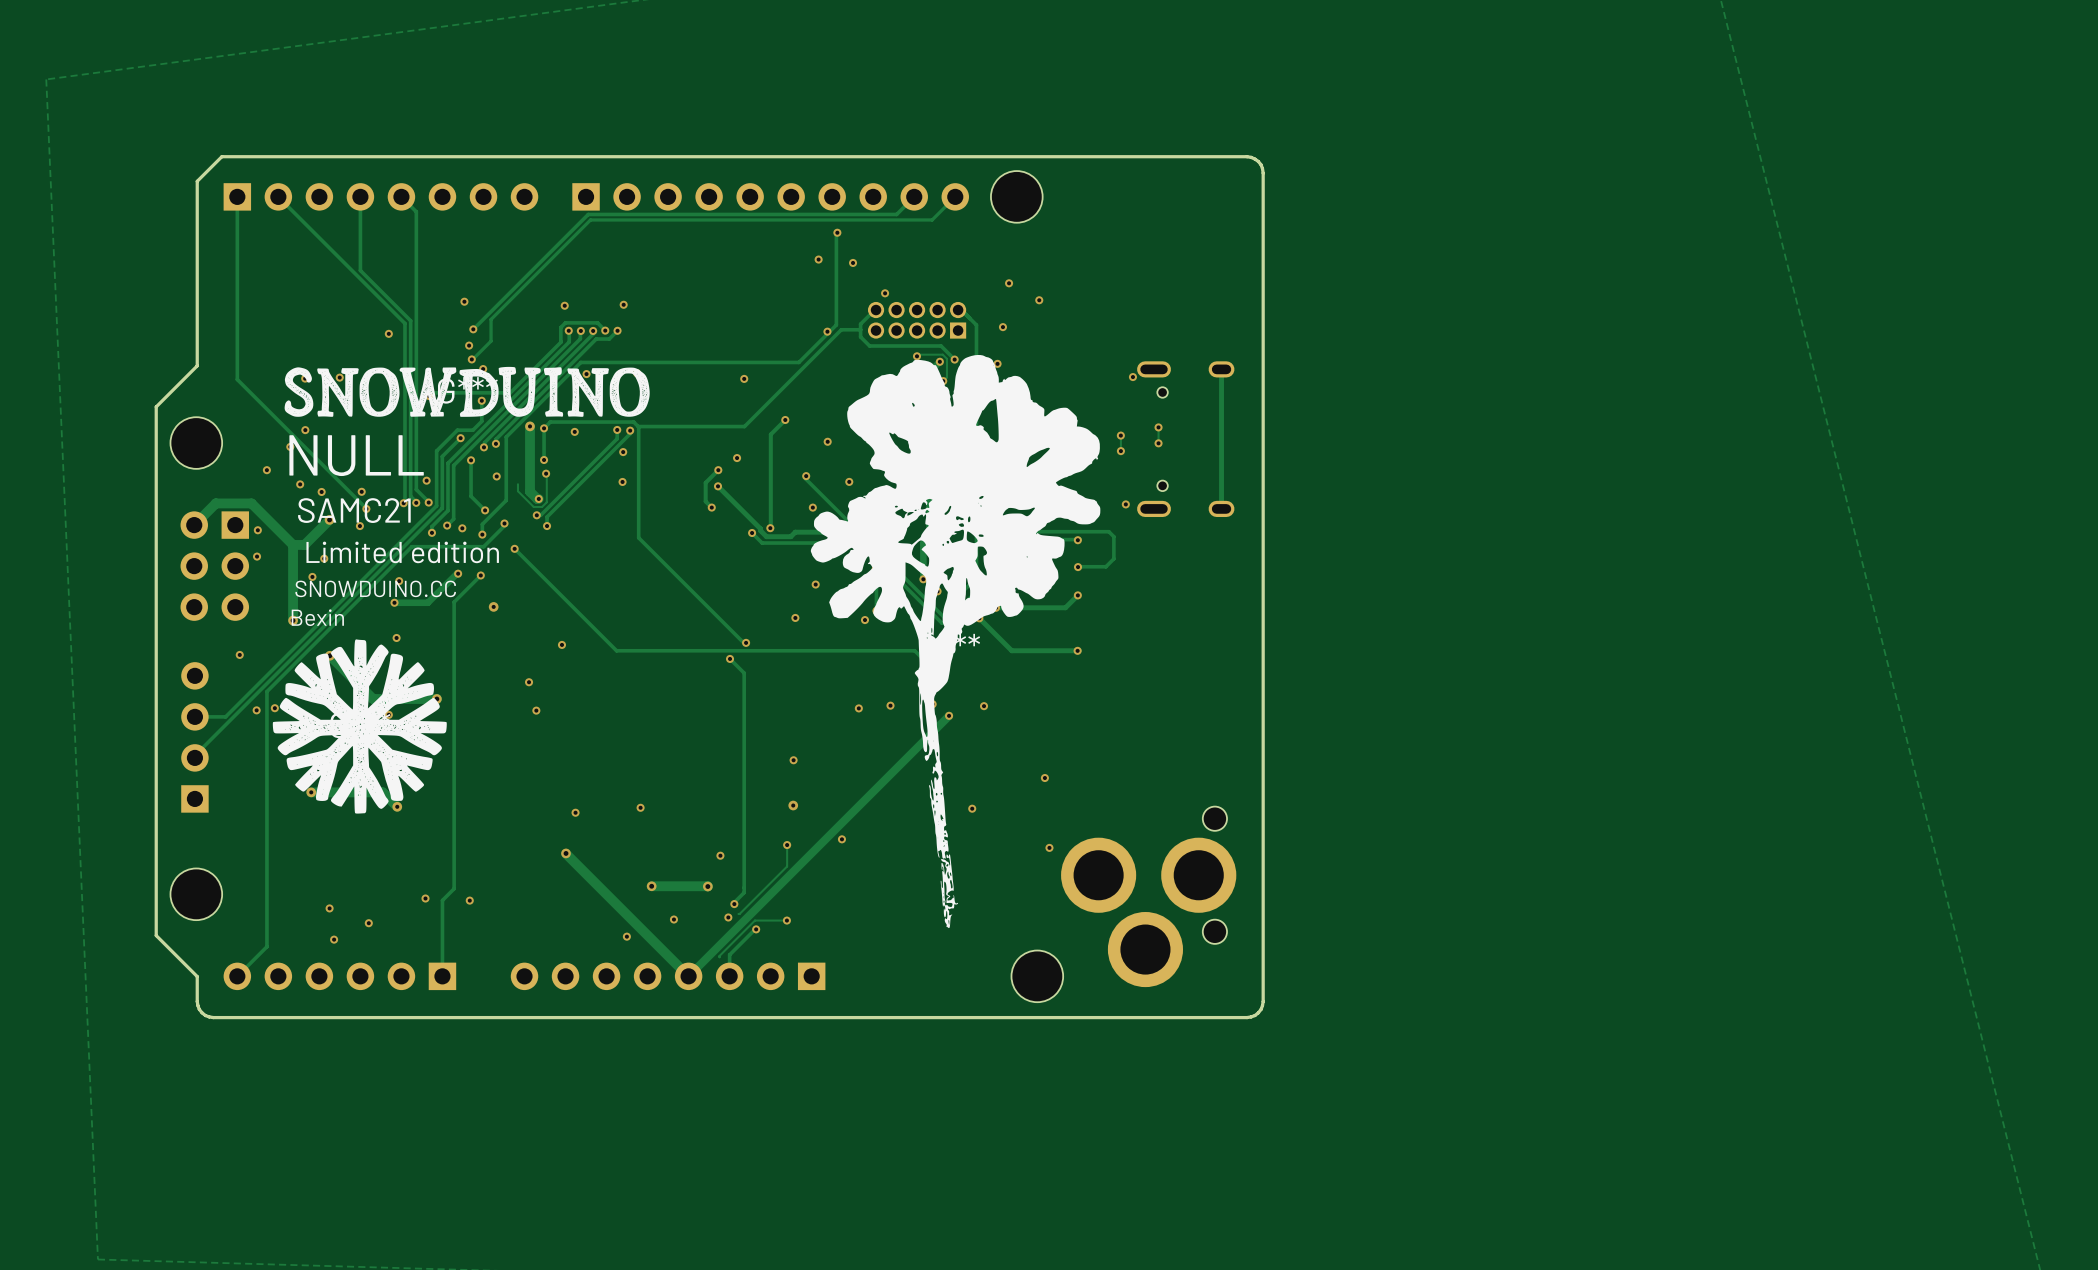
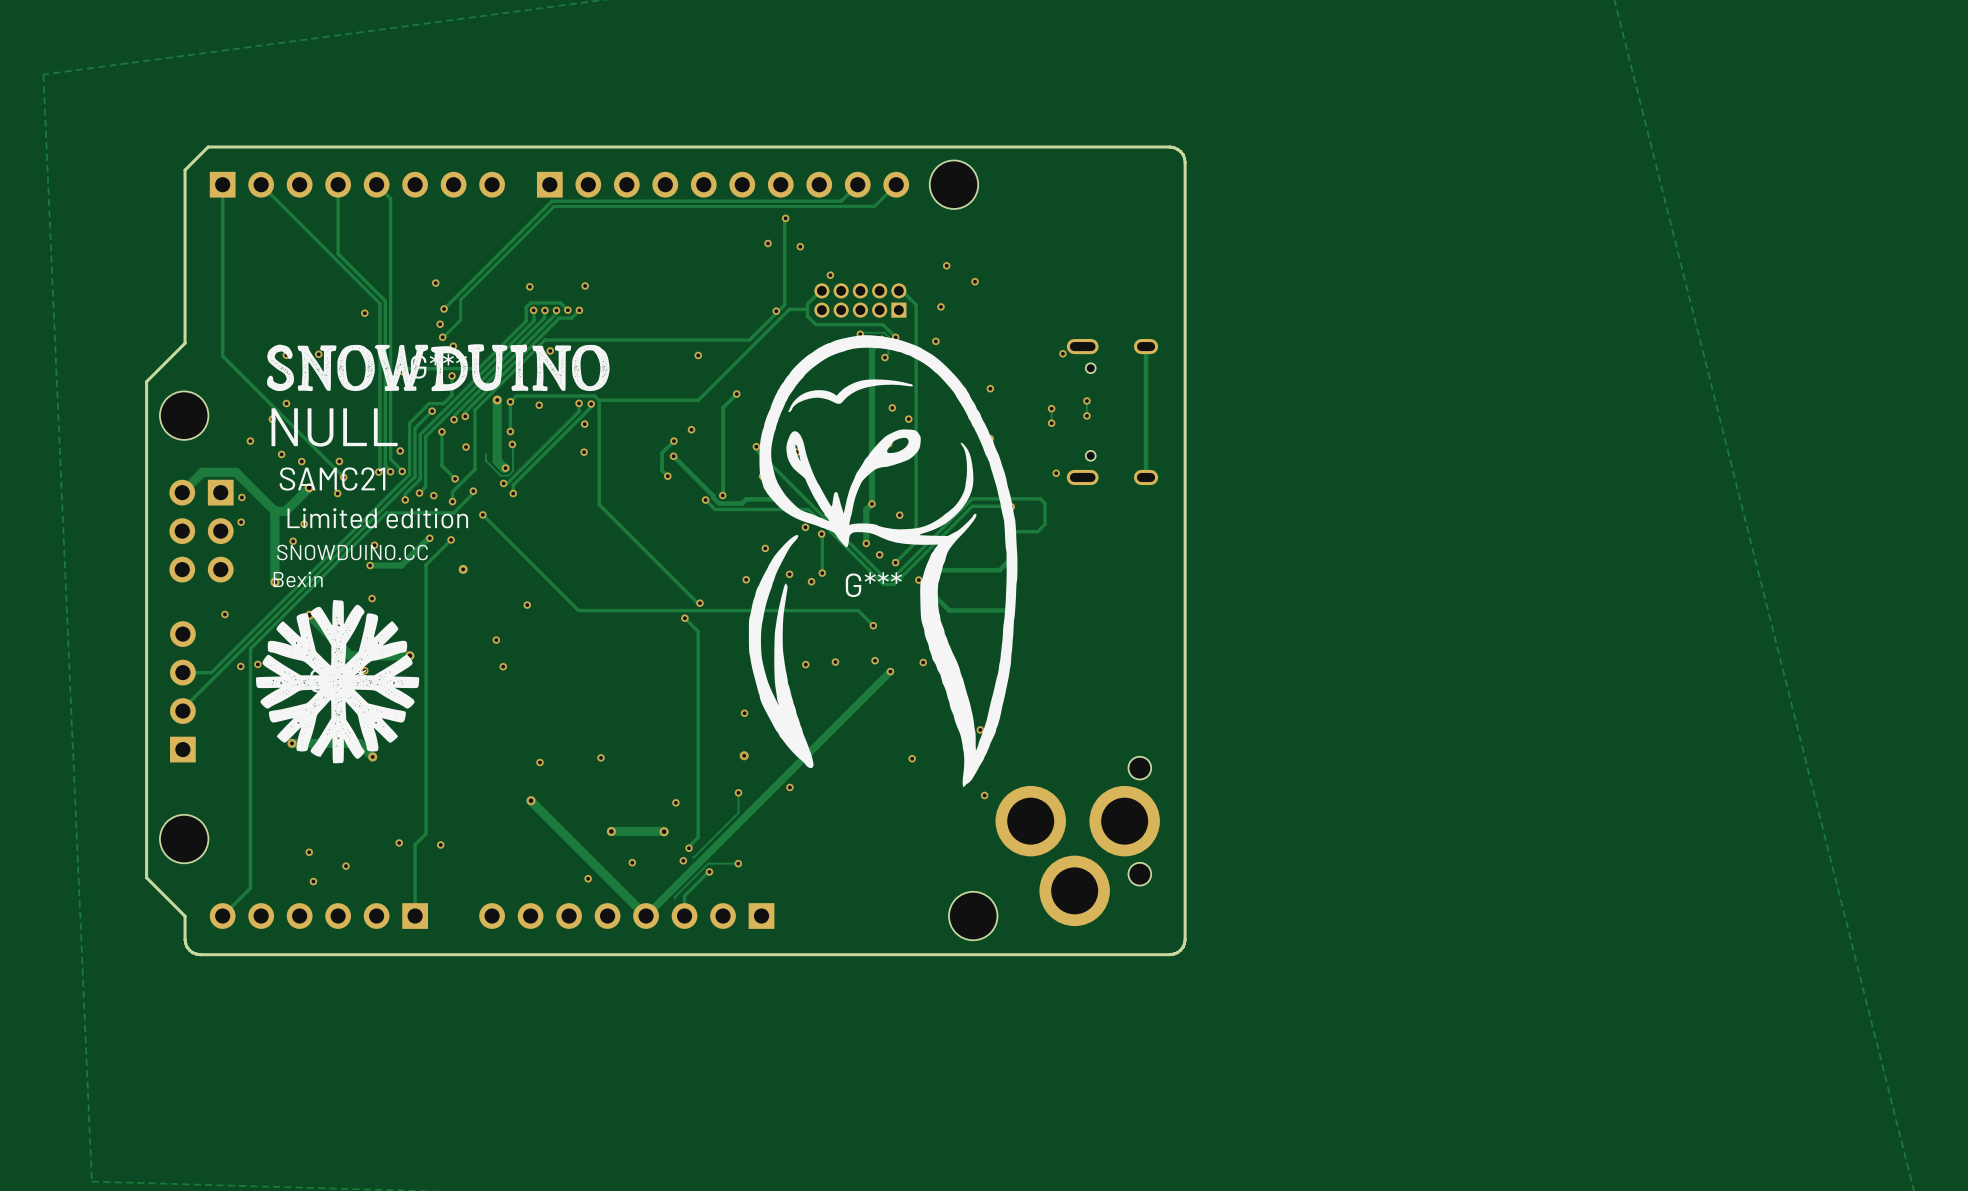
G***: none -> (883, 561)
part: (955, 641) -> none

